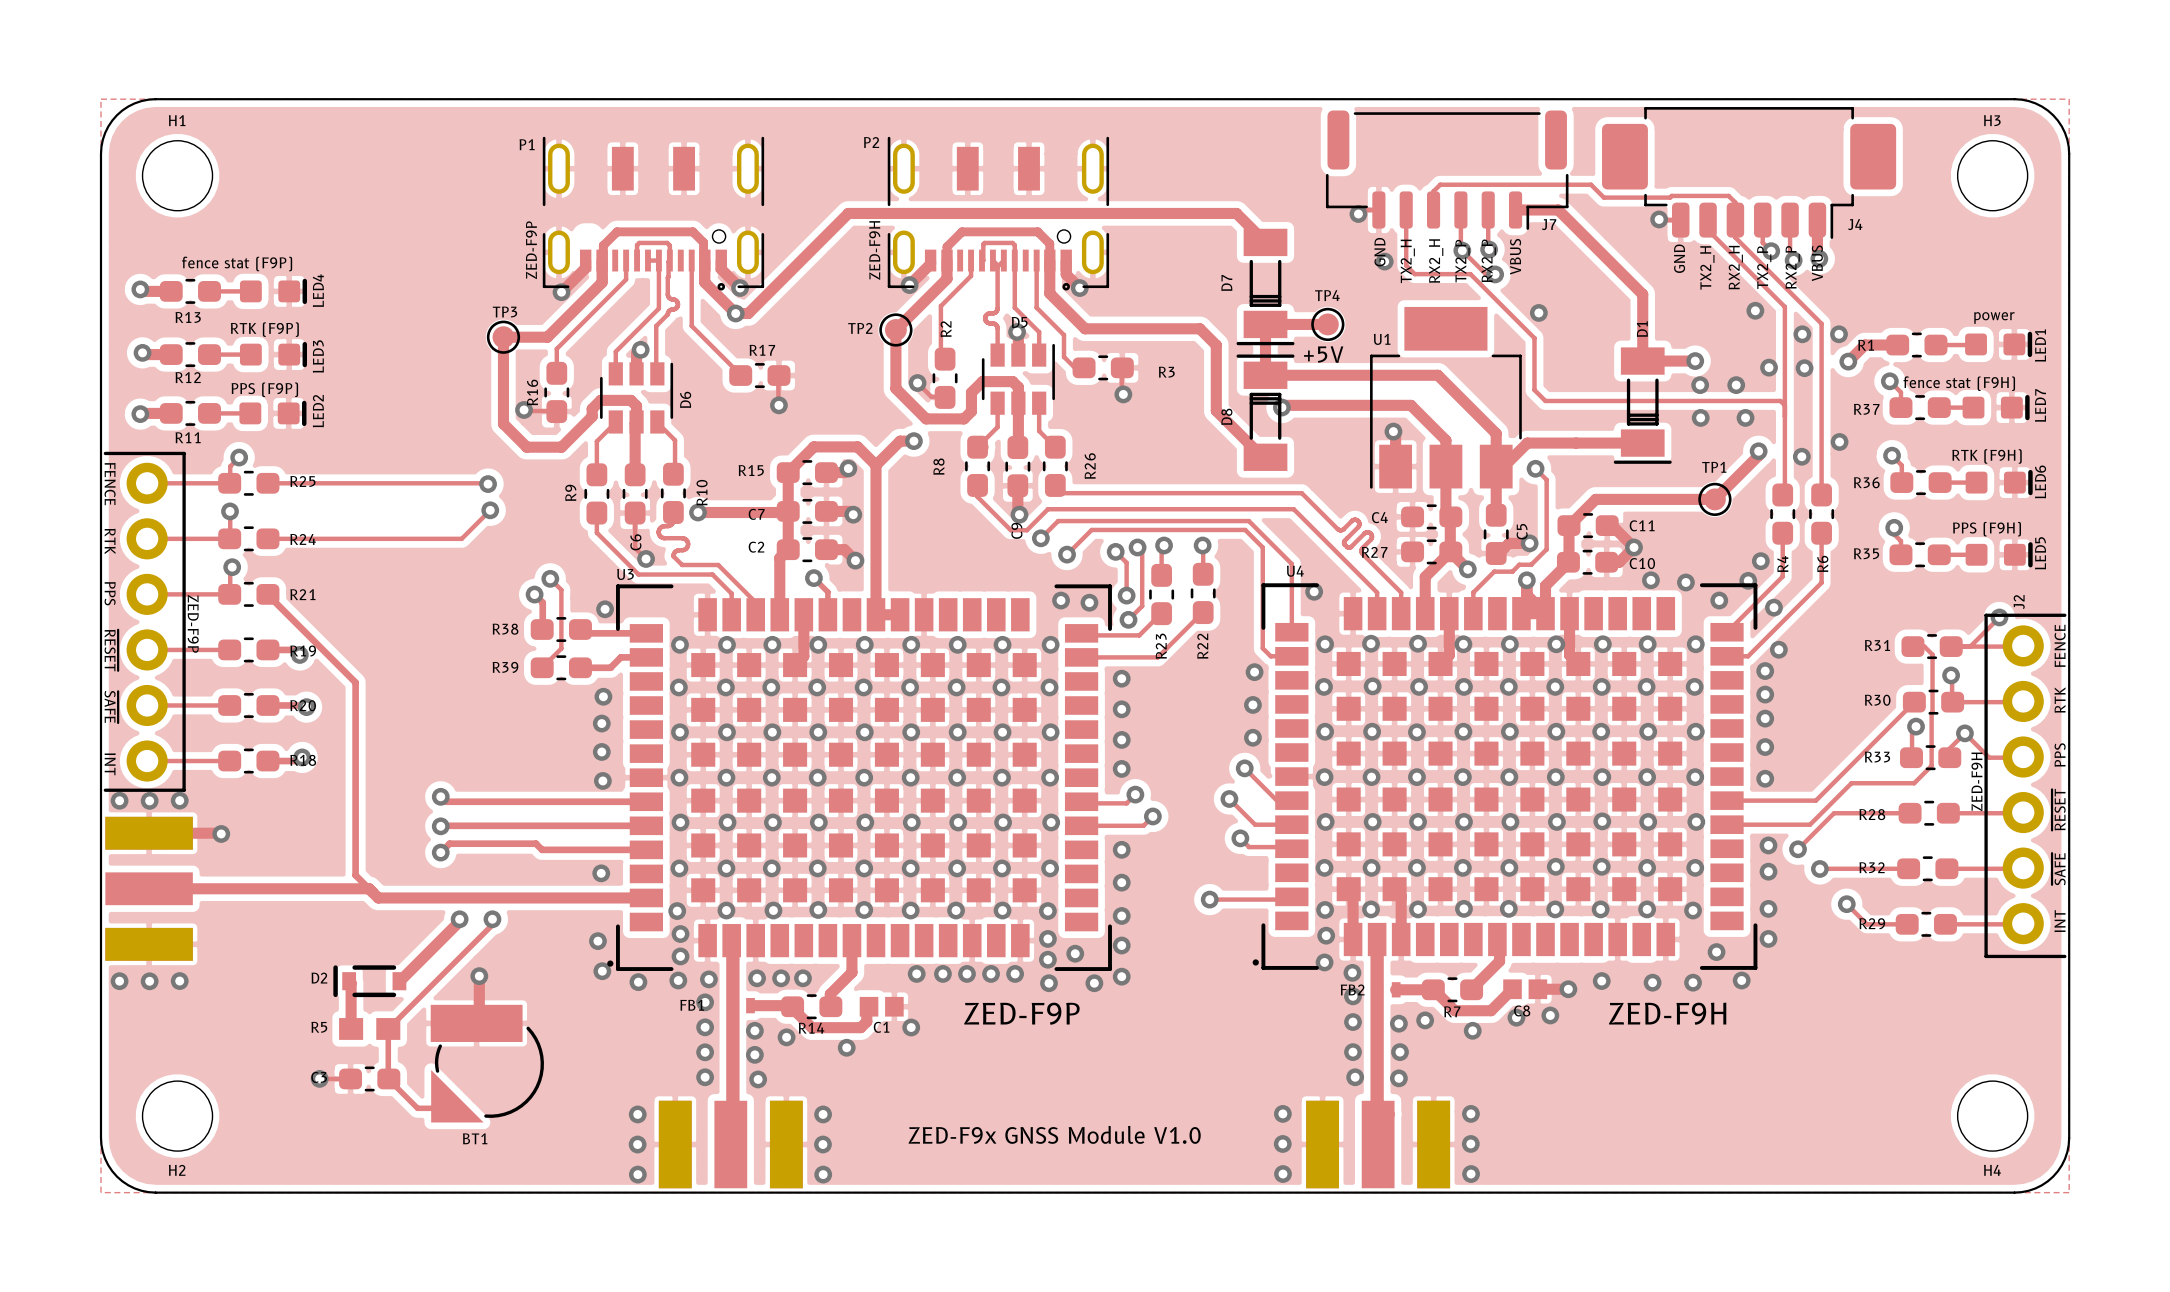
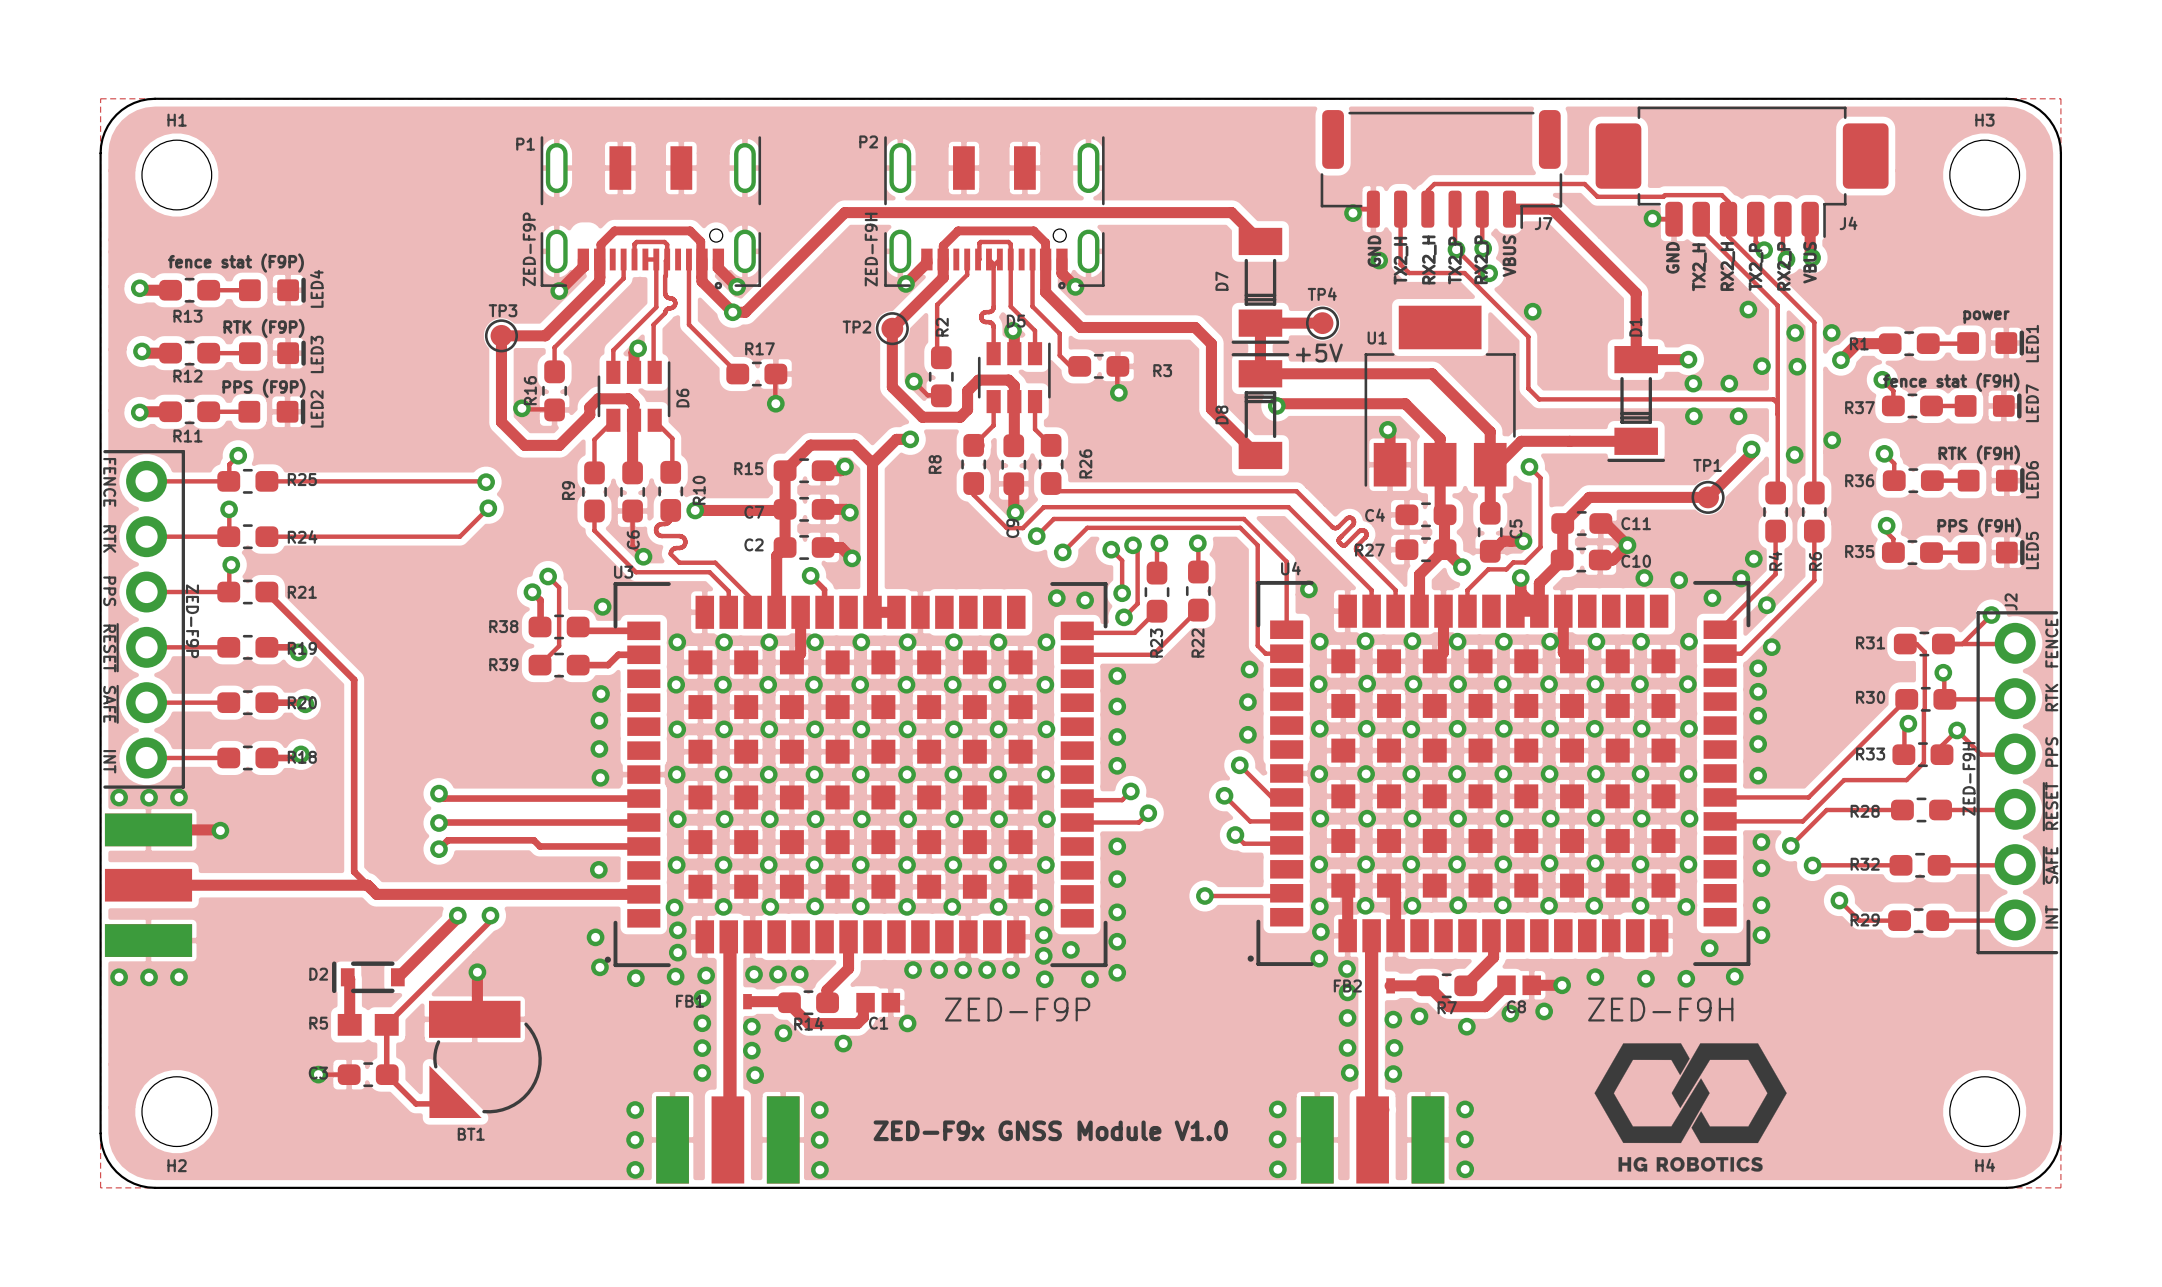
drawing: none -> [1594, 1043, 1787, 1172]

